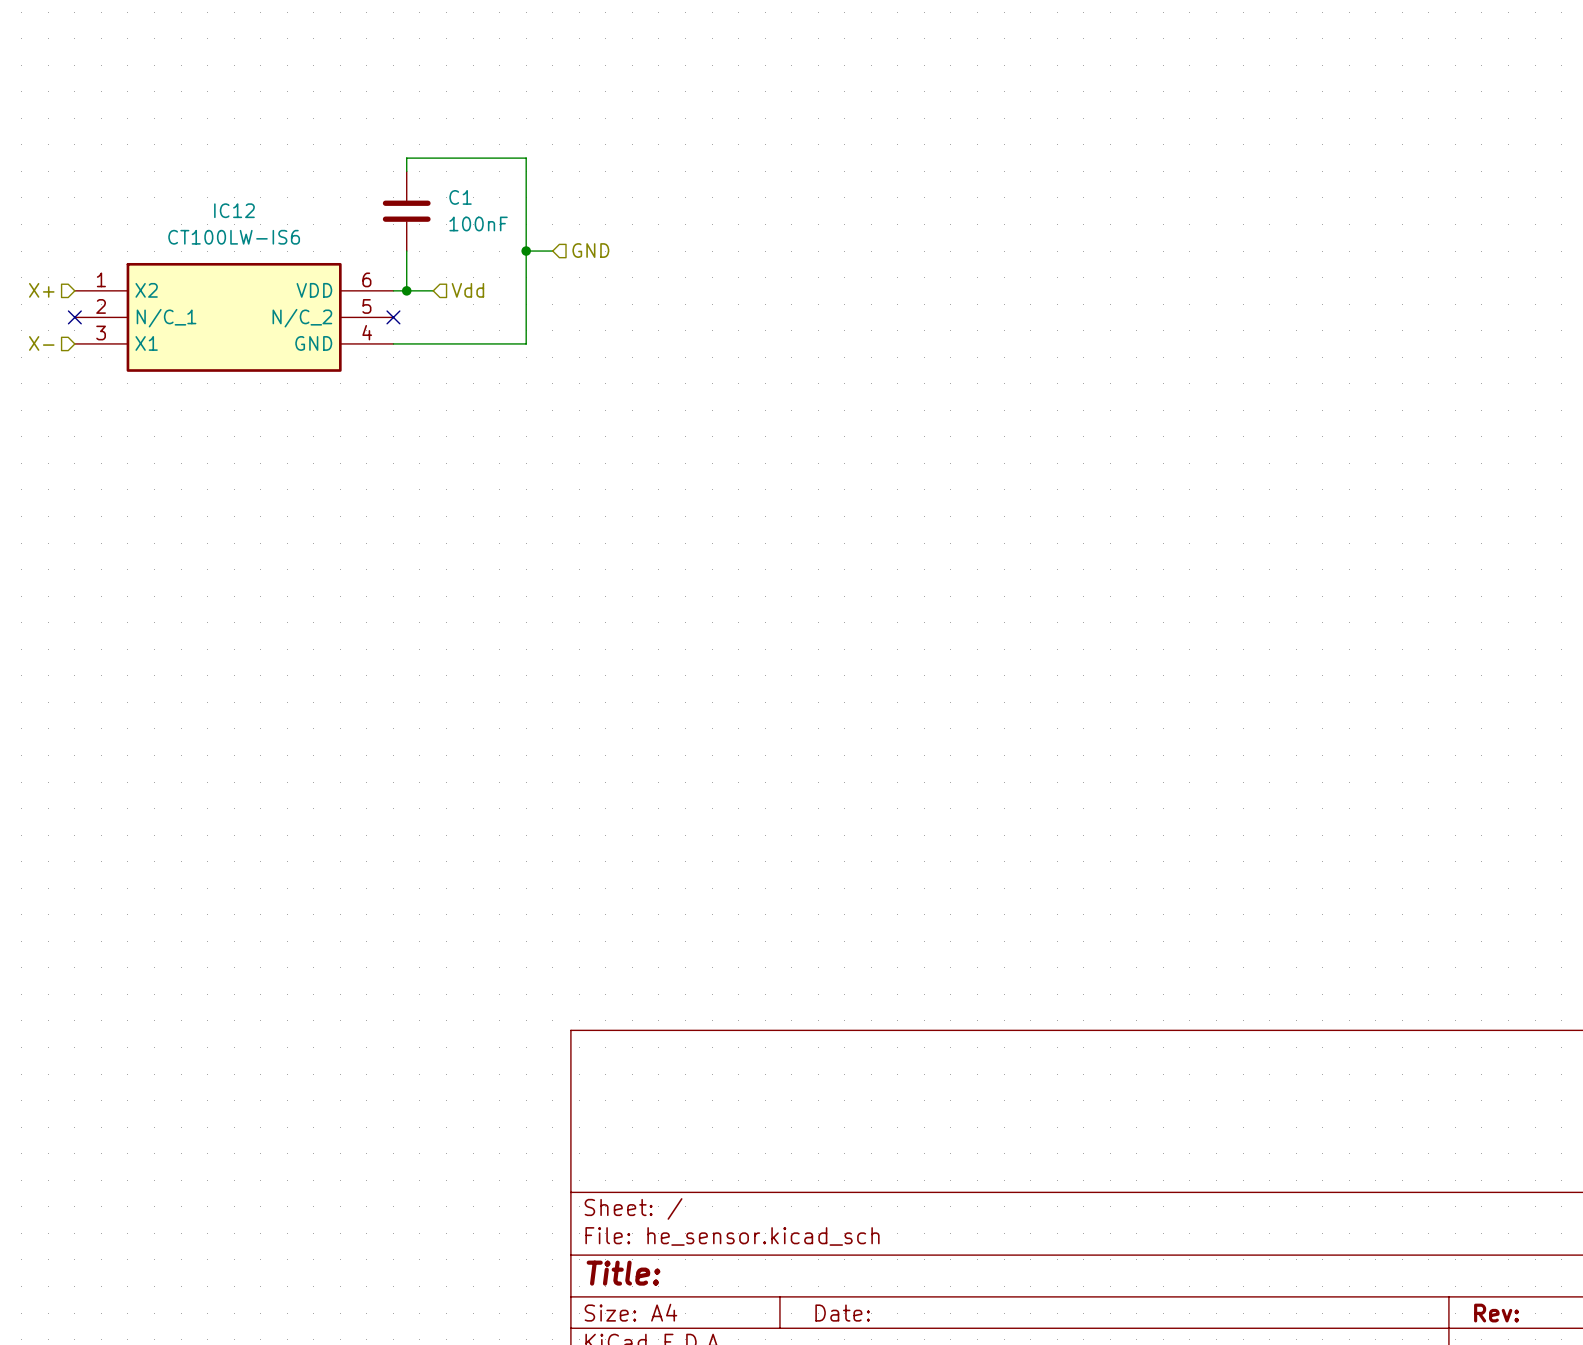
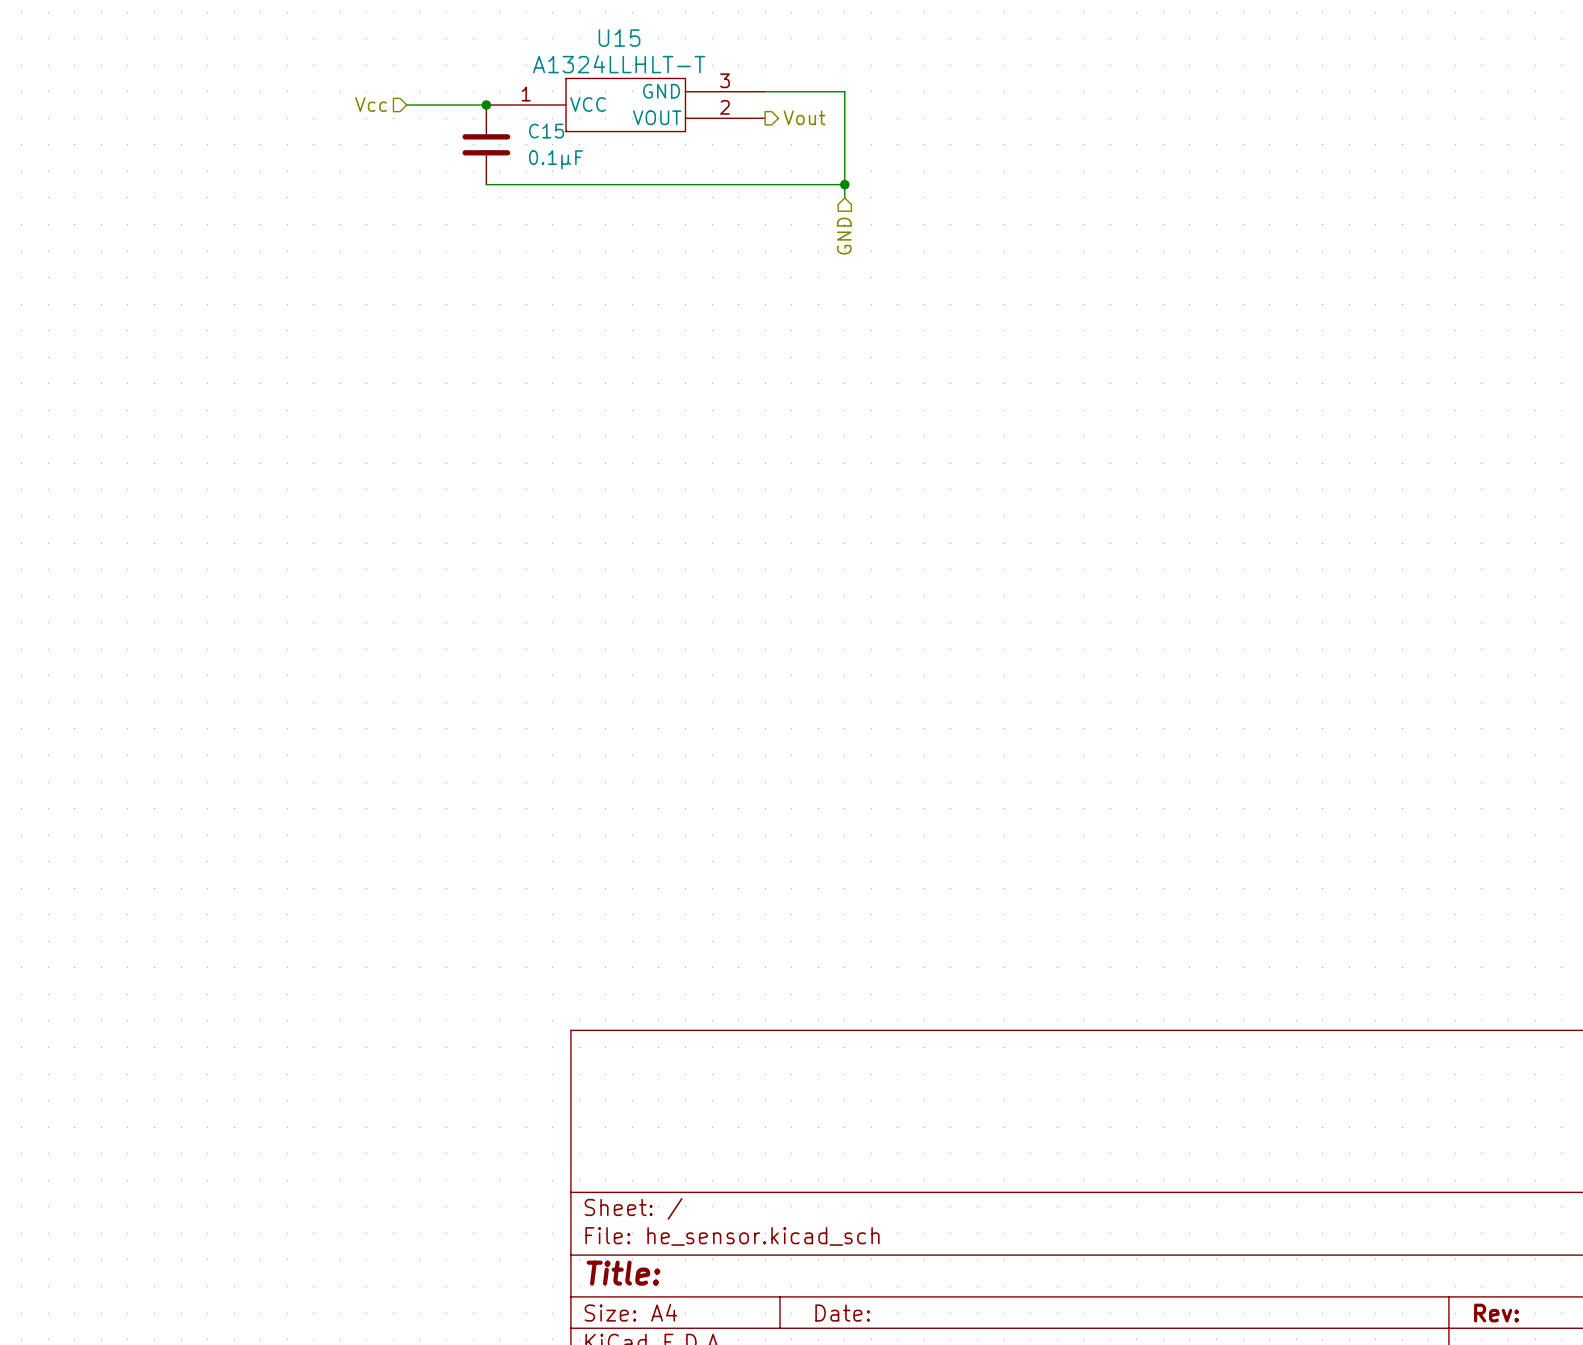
wire: none -> (765, 91) (844, 91) (844, 197)
hierarchical label: none -> Vcc (371, 104)
wire: none -> (406, 105) (486, 105)
junction: none -> (486, 105)
U15: none -> A1324LLHLT-T (625, 105)
hierarchical label: none -> Vout (804, 117)
C15: none -> 0.1µF (486, 144)
wire: (406, 171) (406, 158) (526, 158) (526, 343) (393, 343) -> none
wire: none -> (486, 184) (844, 184)
junction: none -> (844, 184)
C1: 100nF (406, 211) -> none
hierarchical label: none -> GND (844, 236)
hierarchical label: GND (590, 250) -> none
wire: (406, 251) (406, 290) -> none
wire: (526, 251) (552, 251) -> none
junction: (526, 251) -> none
hierarchical label: X+ (41, 290) -> none
wire: (393, 290) (433, 290) -> none
junction: (406, 290) -> none
hierarchical label: Vdd (467, 290) -> none
no-connect mark: (74, 317) -> none
IC12: CT100LW-IS6 (234, 317) -> none
no-connect mark: (393, 317) -> none
hierarchical label: X- (41, 343) -> none

